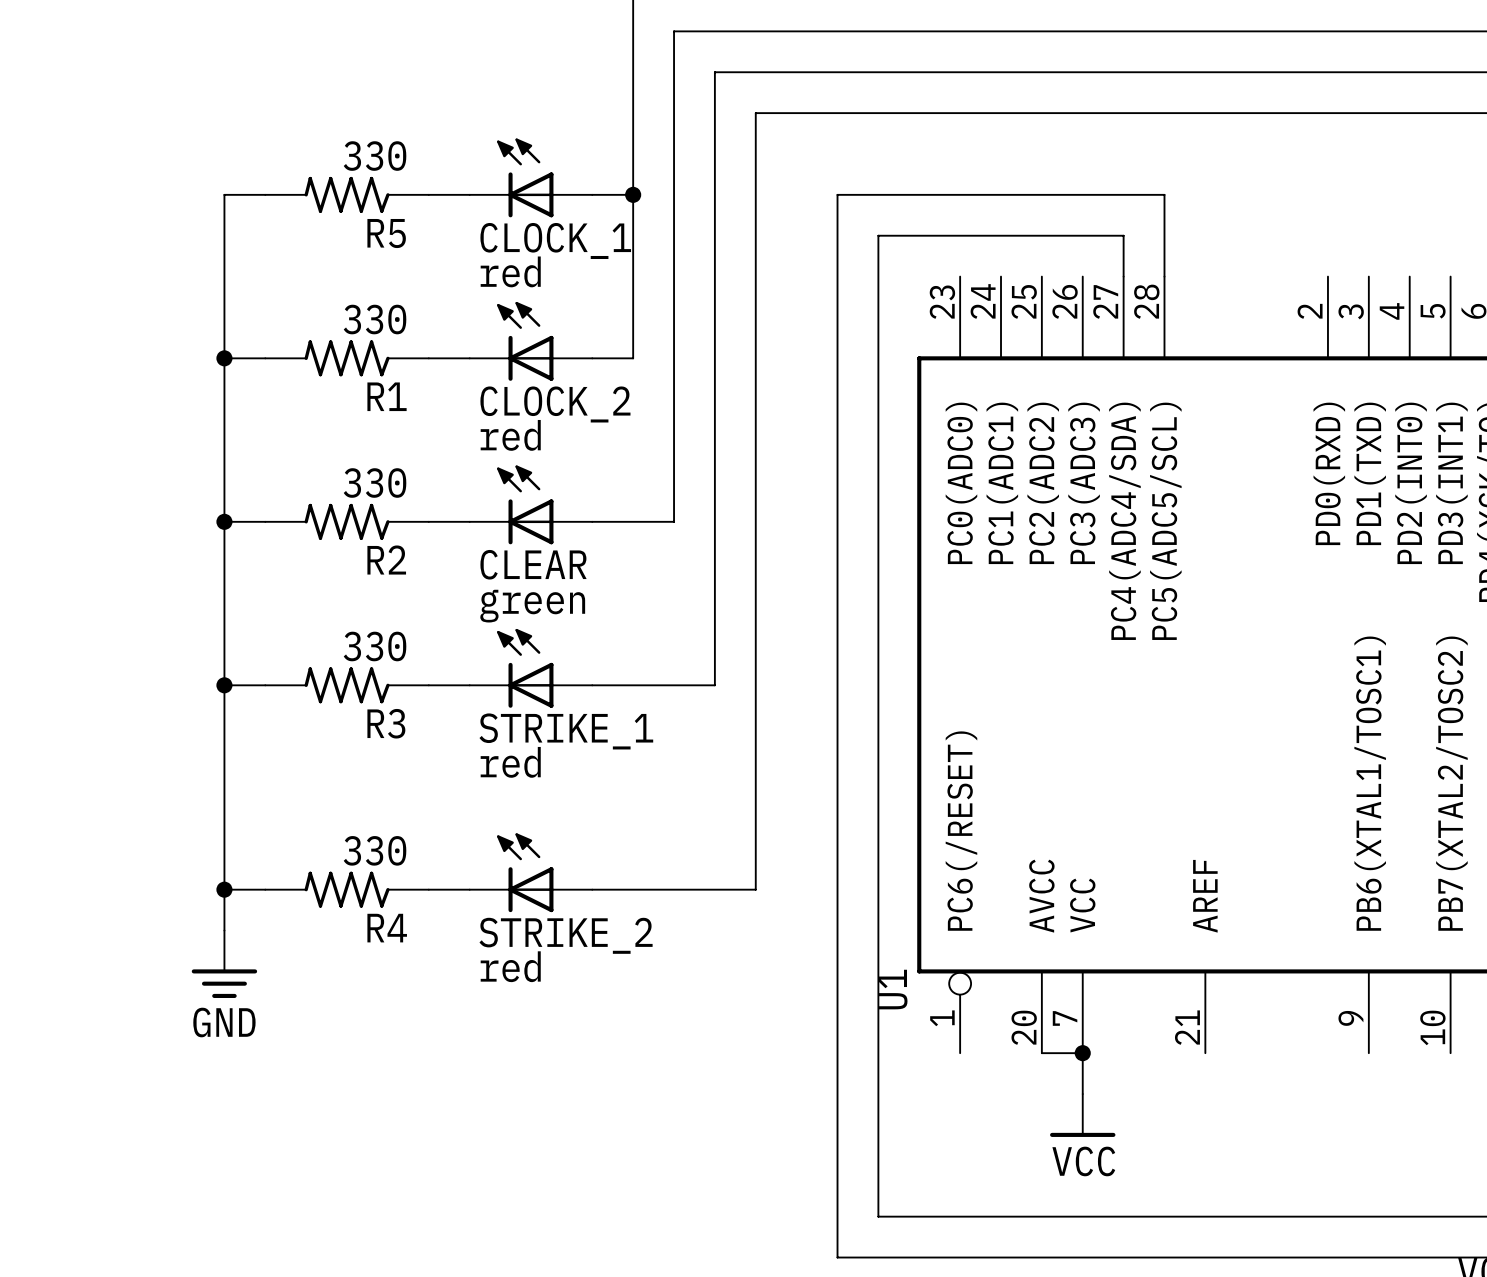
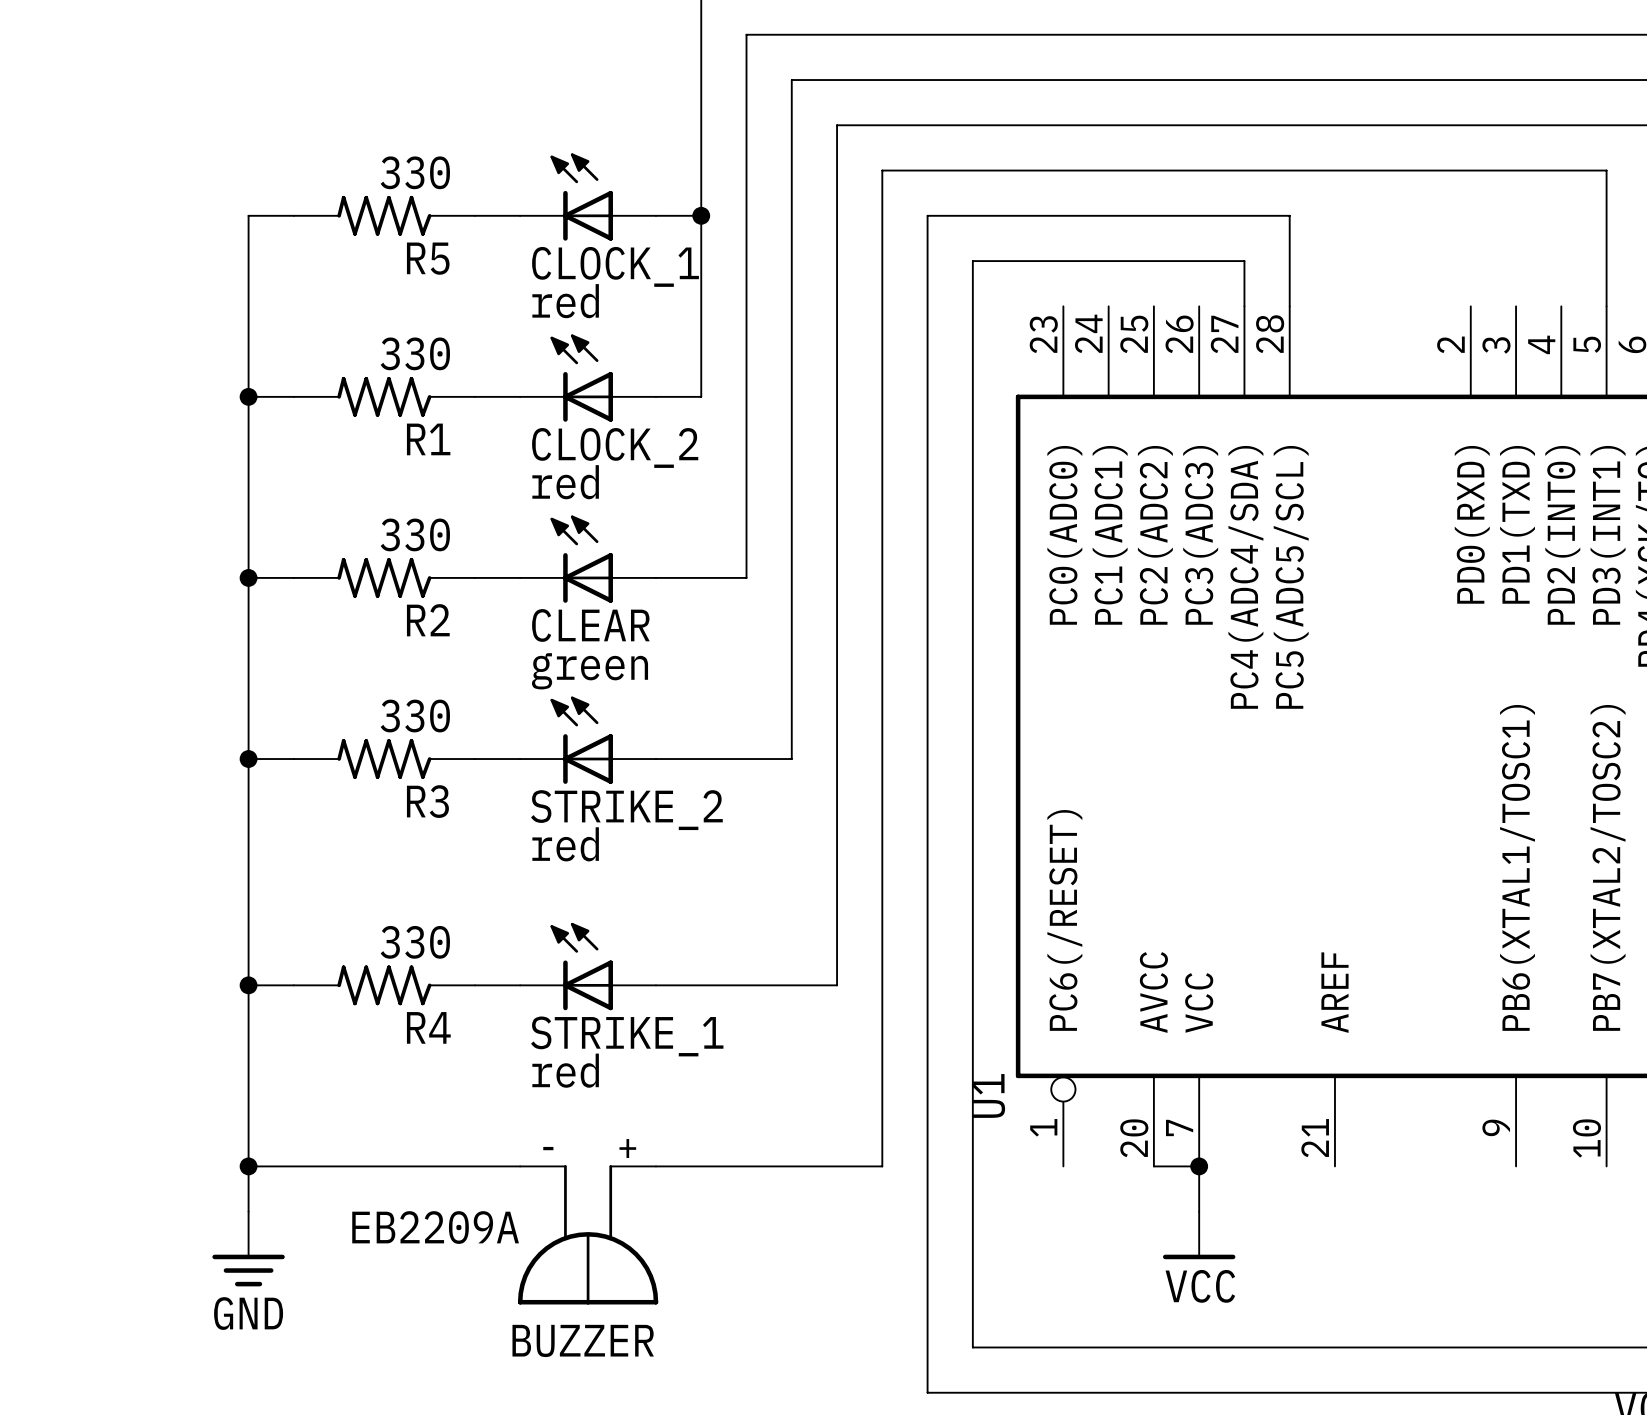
wire: none -> (1606, 306) (1606, 170) (882, 170) (882, 1166) (655, 1166)
STRIKE_1 name: STRIKE_1 (566, 731) -> STRIKE_2 (626, 810)
wire: none -> (248, 1030) (248, 1211)
STRIKE_2 name: STRIKE_2 (566, 935) -> STRIKE_1 (627, 1036)
power symbol position: GND (224, 964) -> GND (248, 1249)
wire: none -> (248, 1166) (520, 1166)
junction: none -> (248, 1166)
BUZZER: none -> EB2209A (588, 1234)

